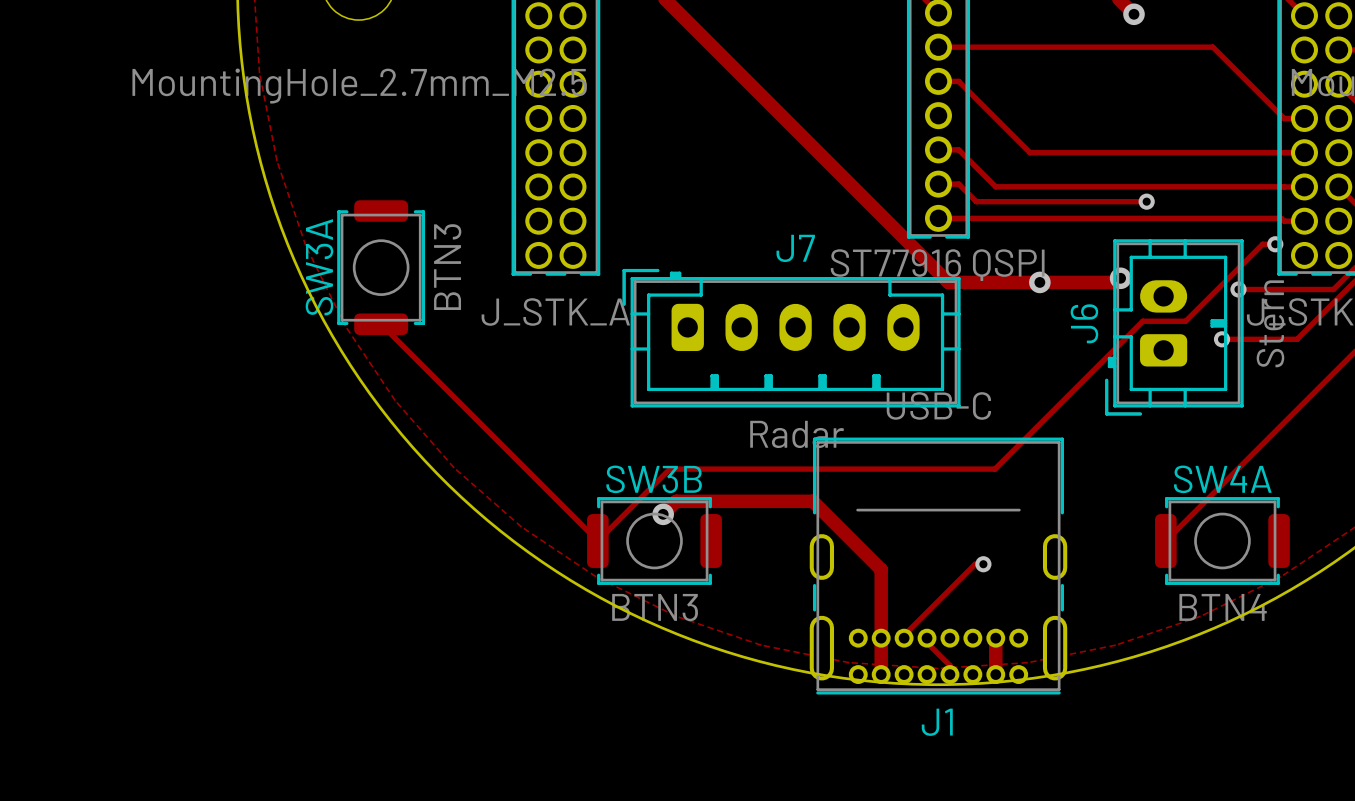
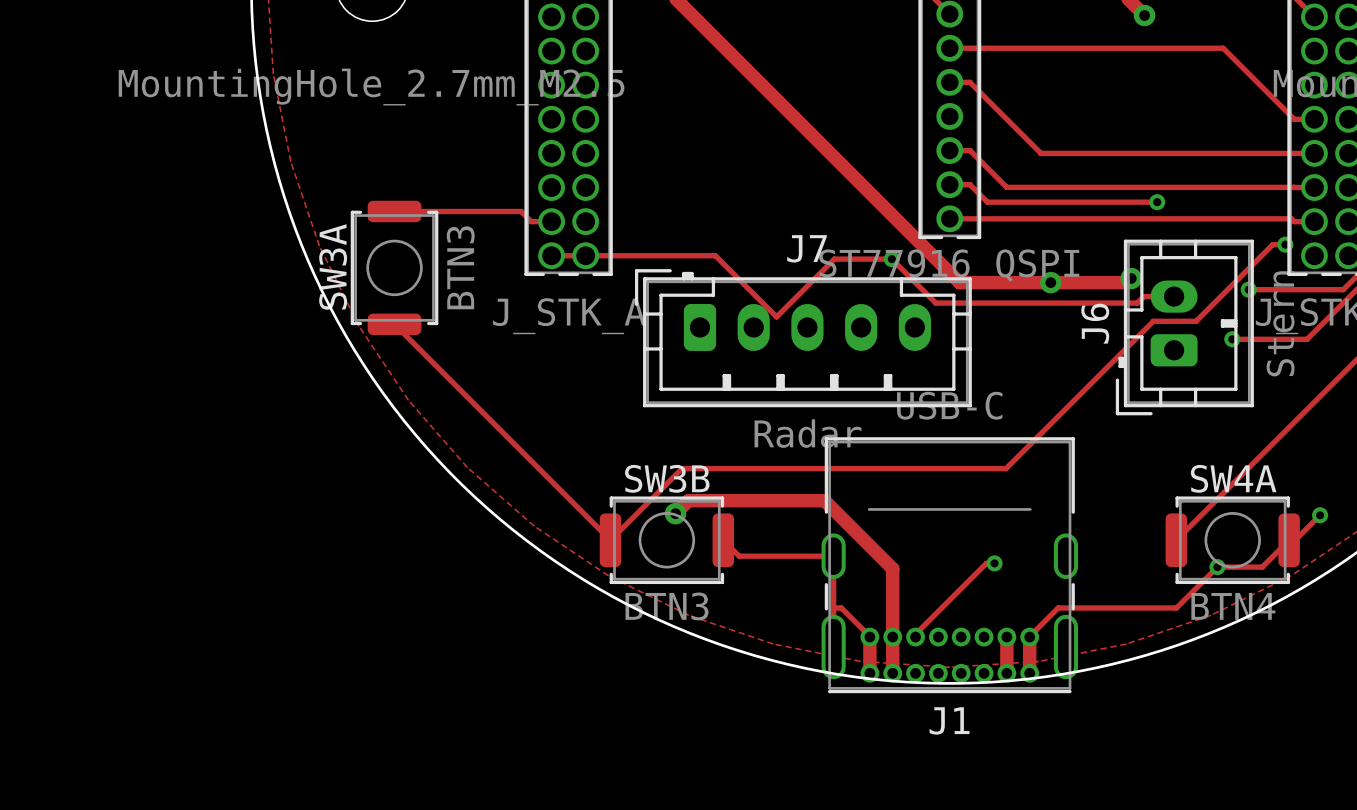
track: none -> (394, 211) (521, 211) (531, 221) (551, 221)
track: none -> (551, 255) (715, 255) (776, 316) (834, 259) (891, 259) (935, 303) (1137, 303) (1143, 296) (1174, 296)
via: none -> (891, 259)
track: none -> (1320, 515) (1295, 540) (1289, 540) (1262, 567) (1217, 567) (1176, 607) (1058, 607) (1029, 636) (1029, 673)
via: none -> (1320, 515)
track: none -> (723, 540) (739, 556) (833, 556) (833, 646)
via: none -> (1217, 567)
track: none -> (833, 607) (841, 607) (869, 636) (869, 673)
track: (927, 638) (927, 642) (949, 665) (949, 674) -> none

